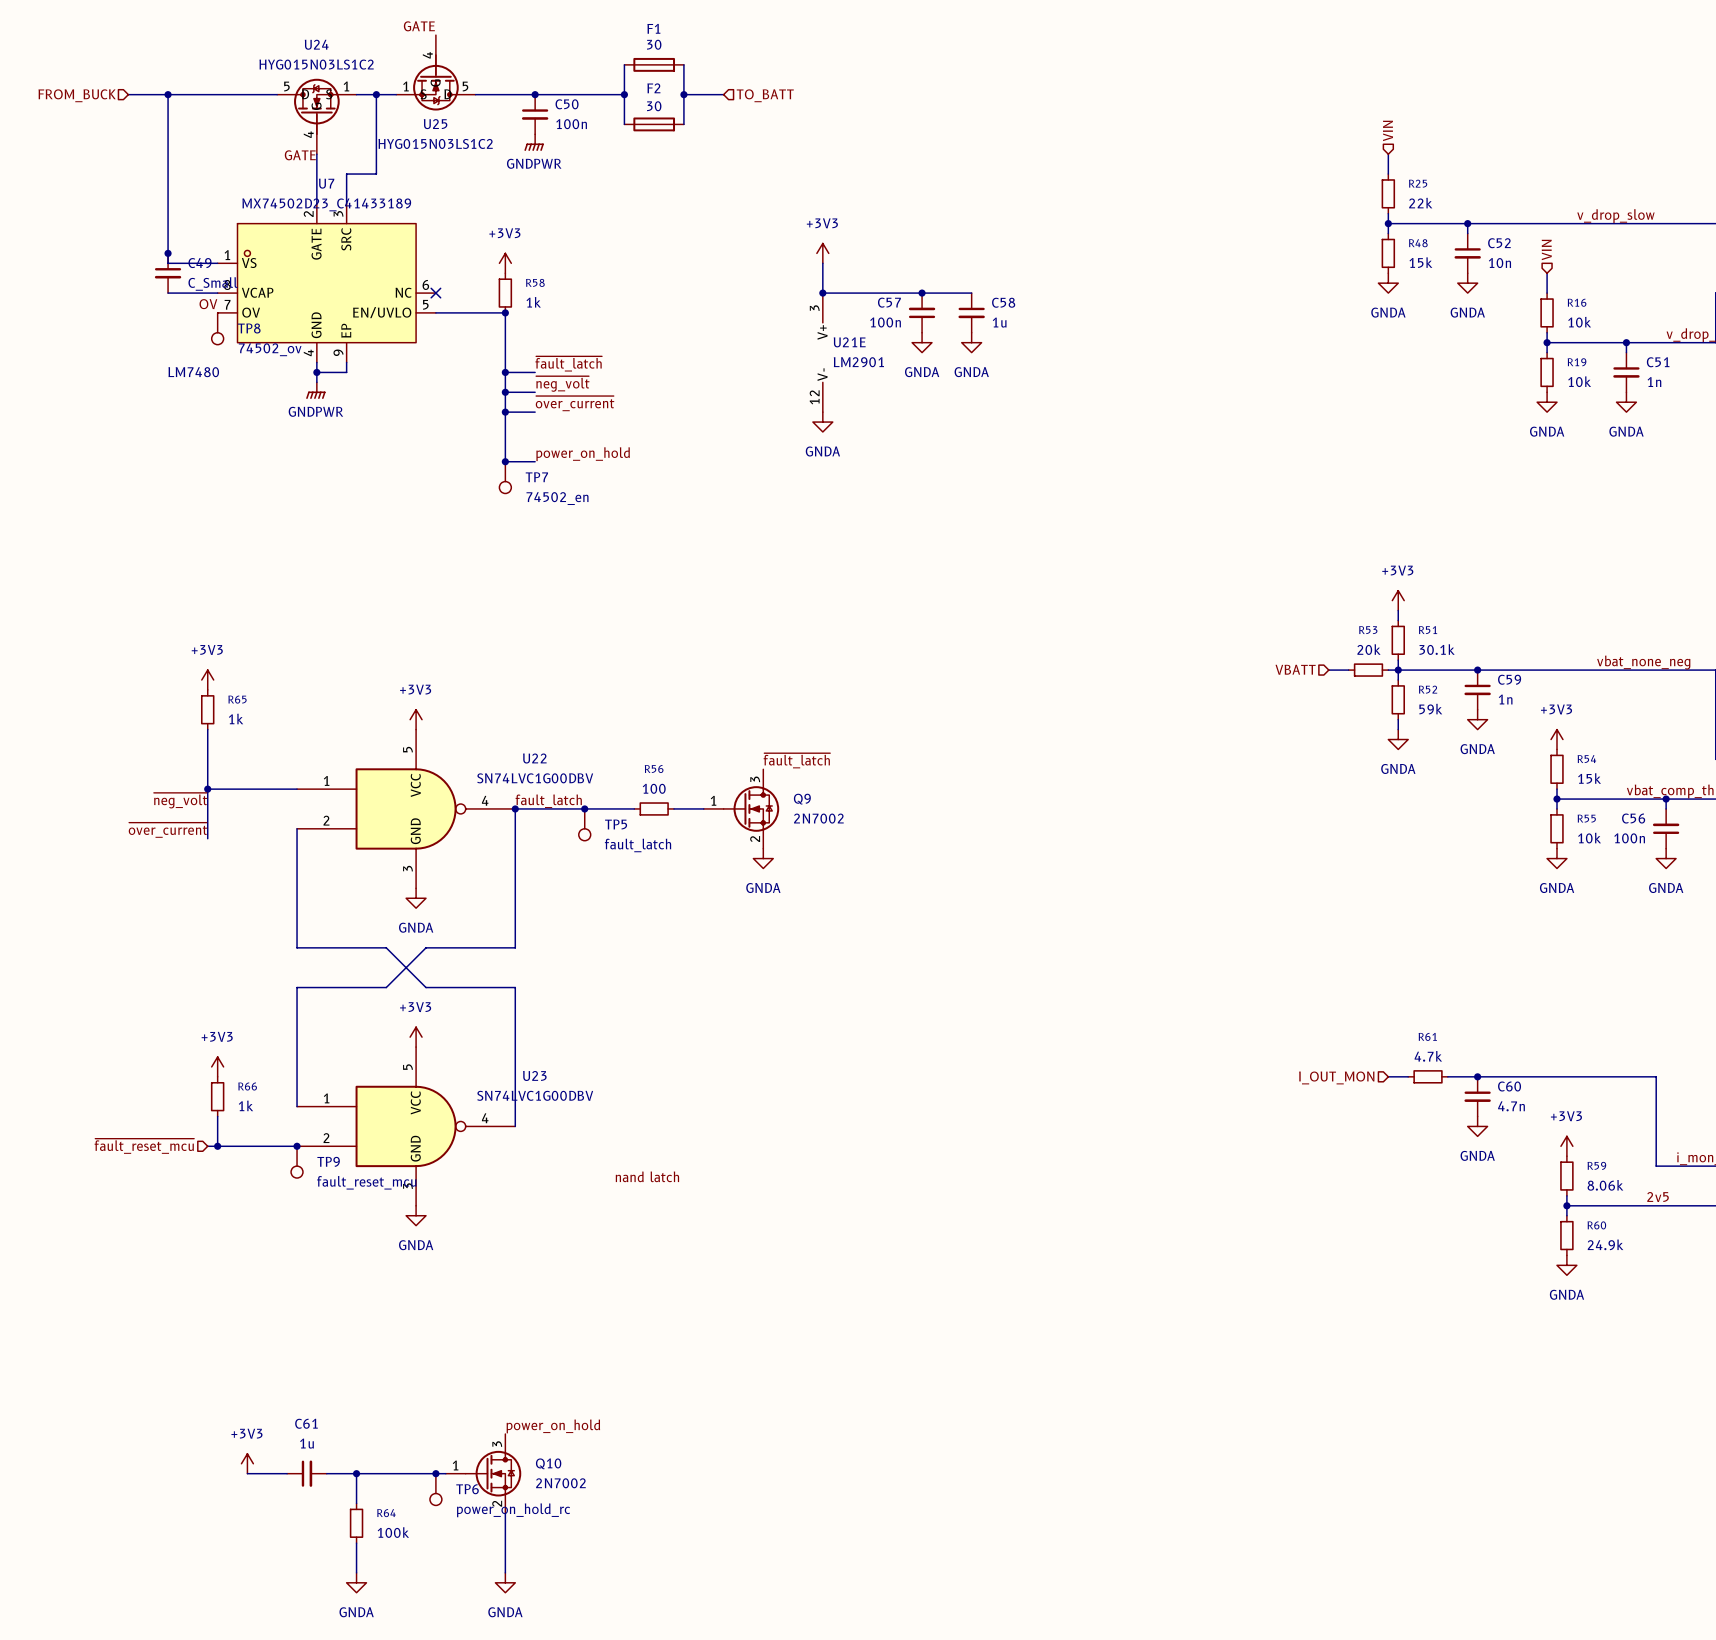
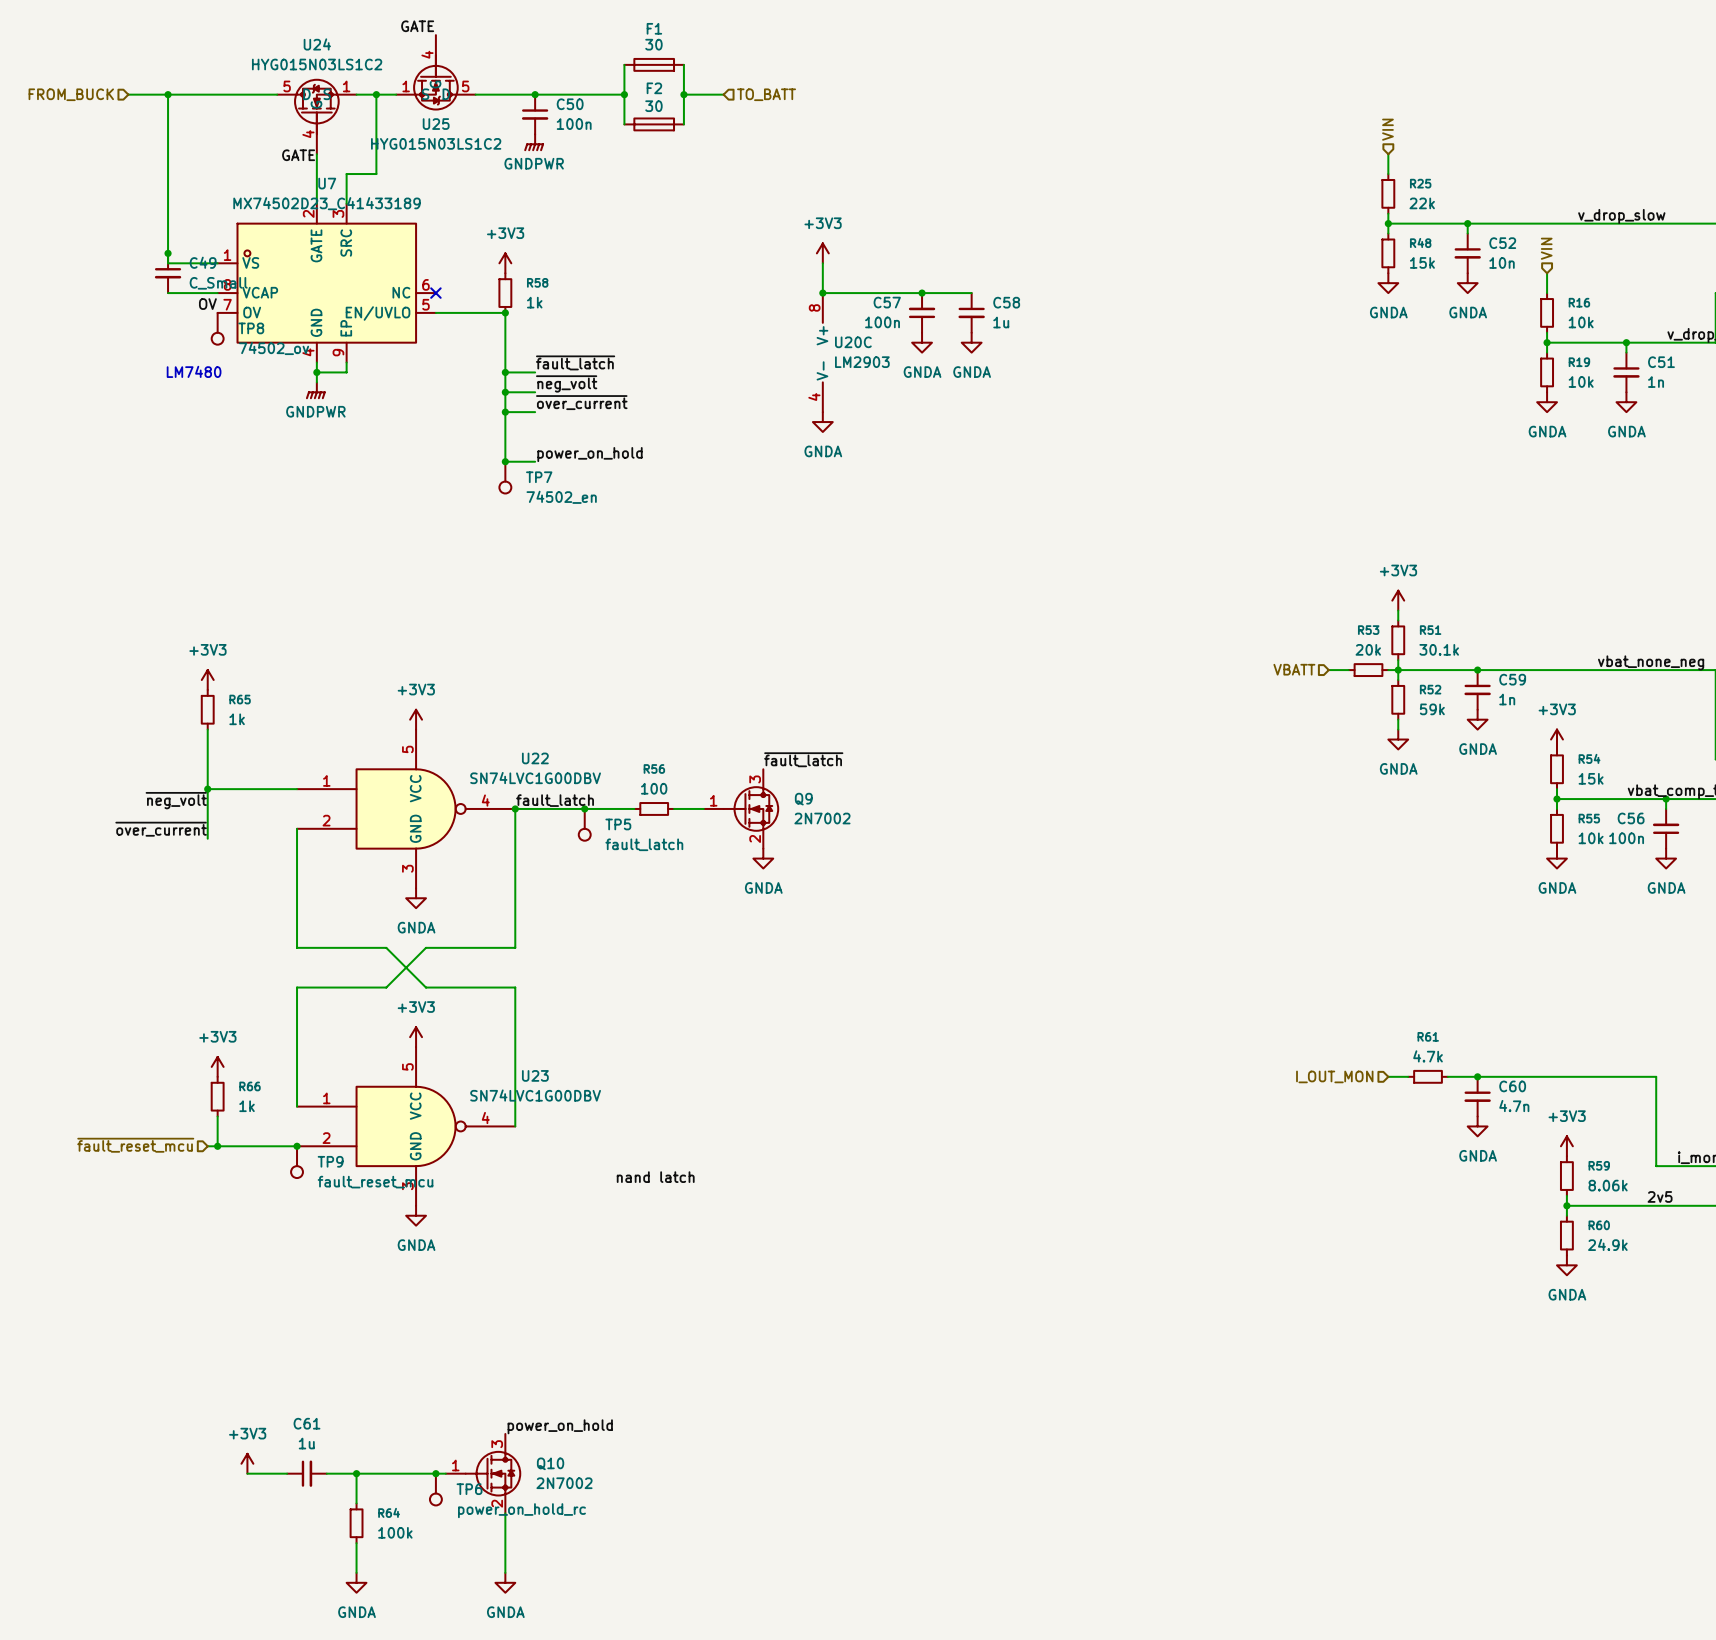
U21E pin number: 3 (814, 308) -> 8 (814, 307)
U21E name: U21E (849, 342) -> U20C (853, 342)
U21E value: LM2901 (858, 362) -> LM2903 (862, 362)
U21E pin number: 12 (814, 397) -> 4 (814, 397)

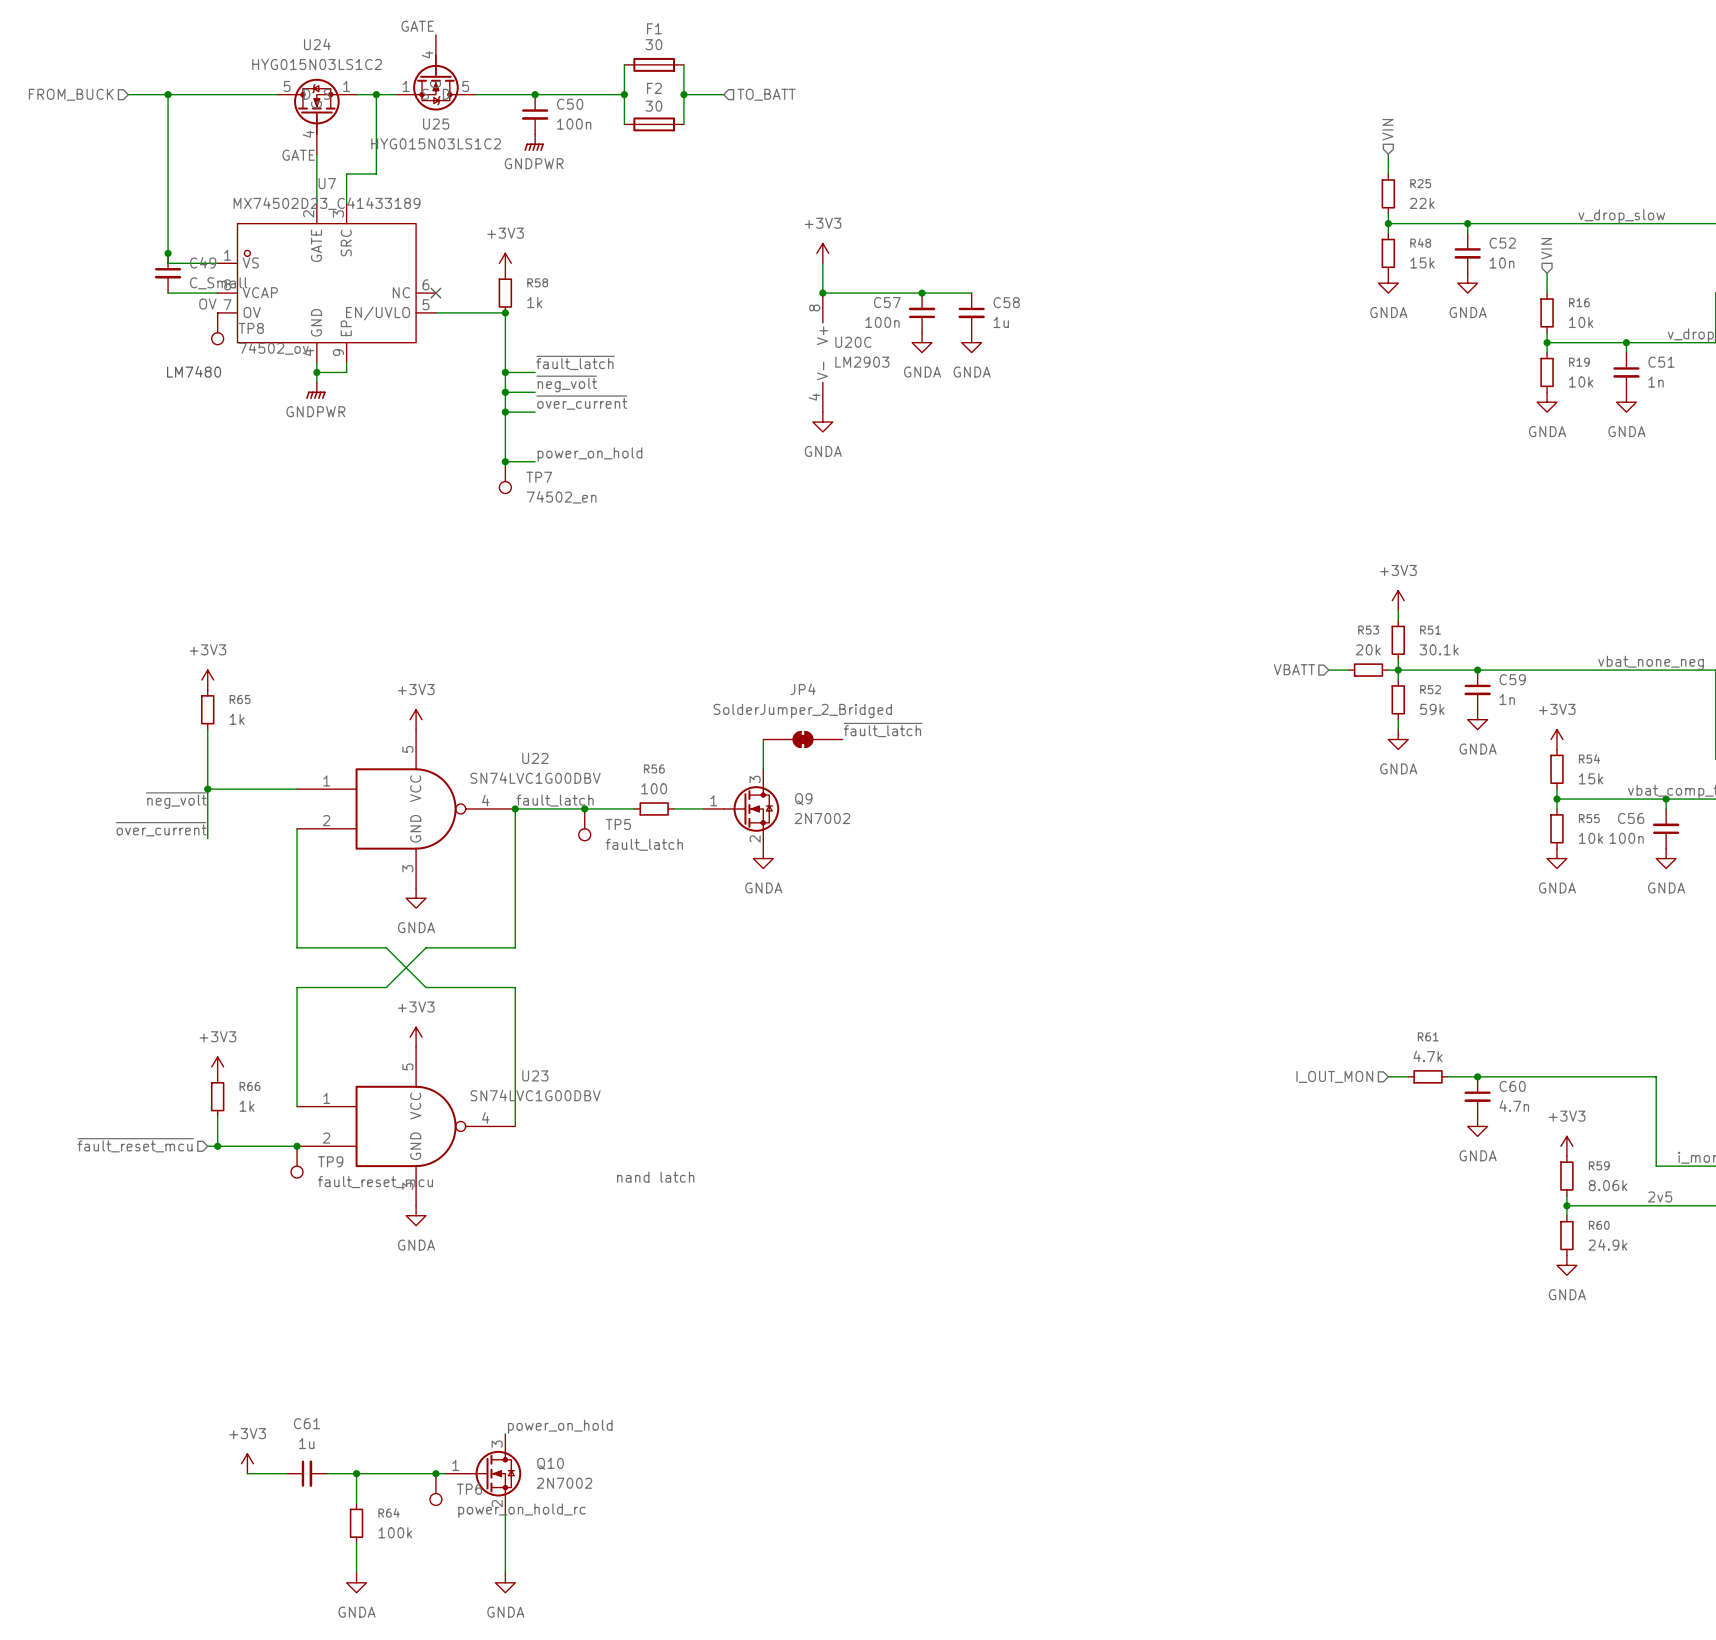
wire: none -> (763, 739) (763, 769)
JP4: none -> SolderJumper_2_Bridged (802, 739)
label position: ~{fault_latch} (803, 759) -> ~{fault_latch} (883, 730)

